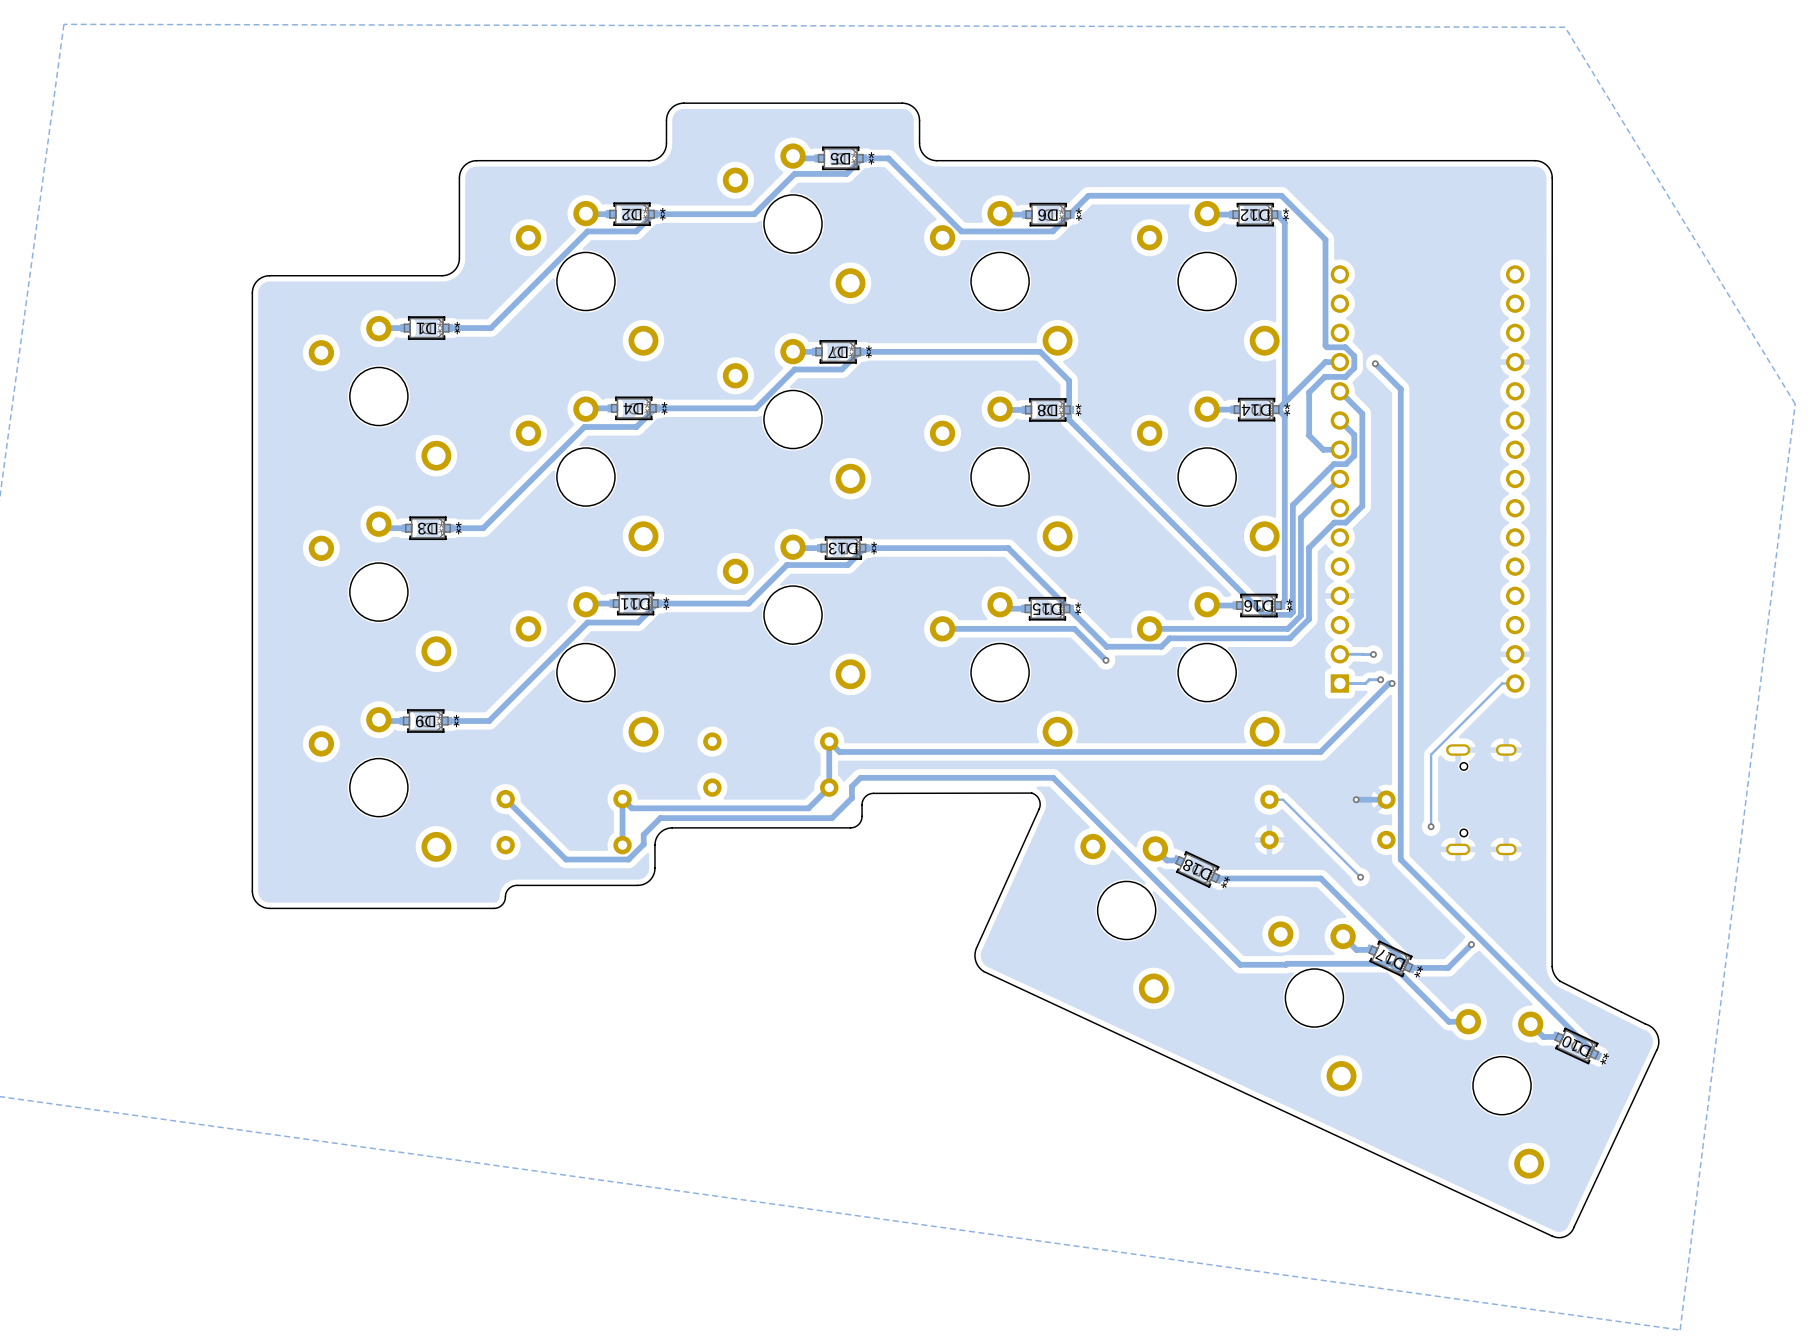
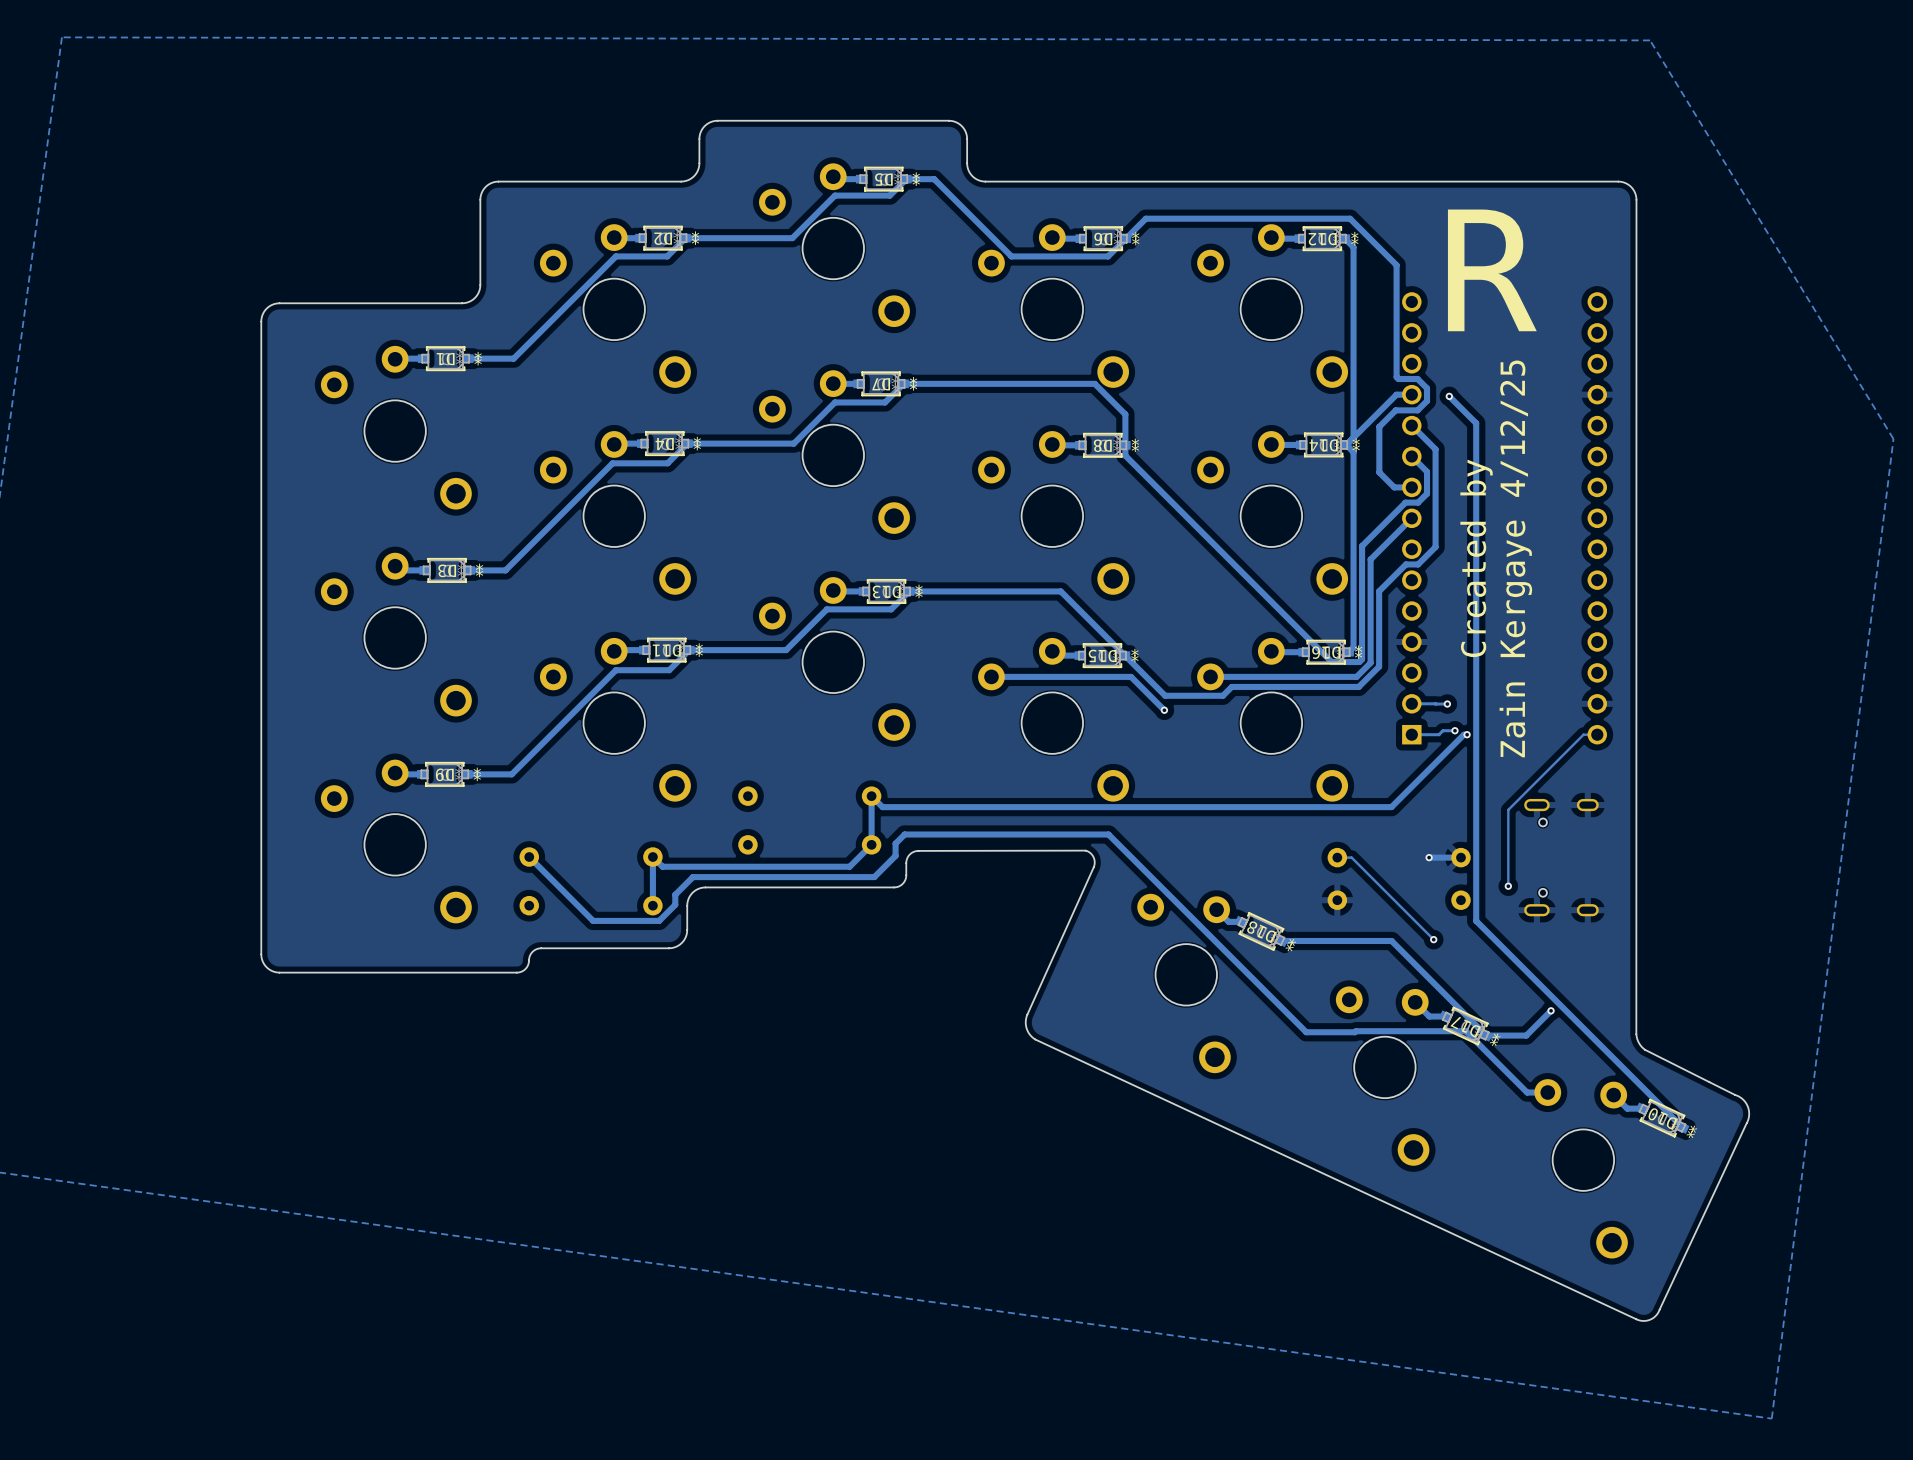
text: none -> R (1492, 270)
text: none -> Created by (1476, 558)
text: none -> Zain Kergaye 4/12/25 (1515, 558)

